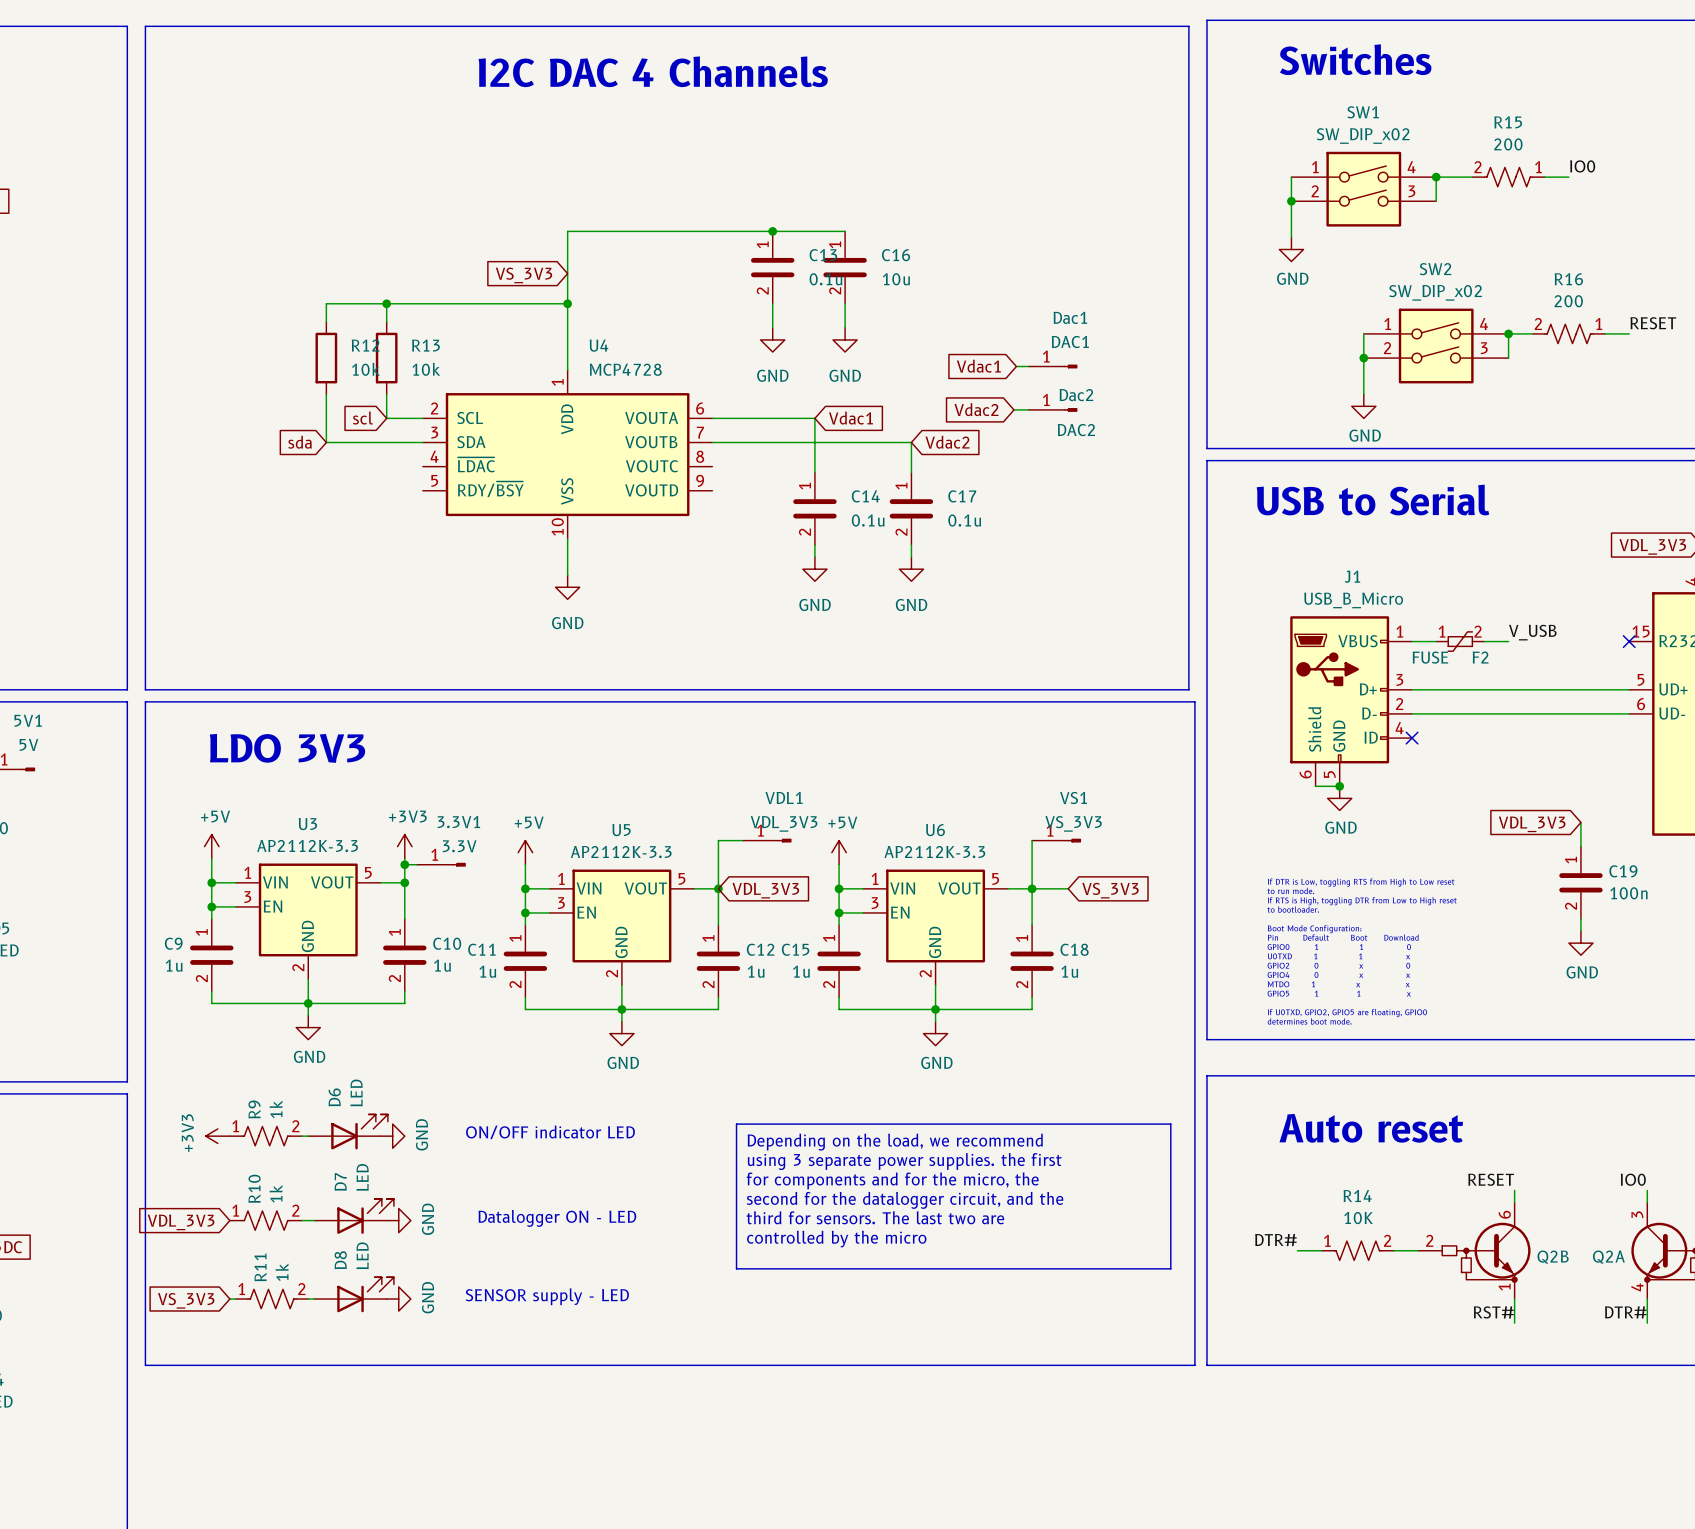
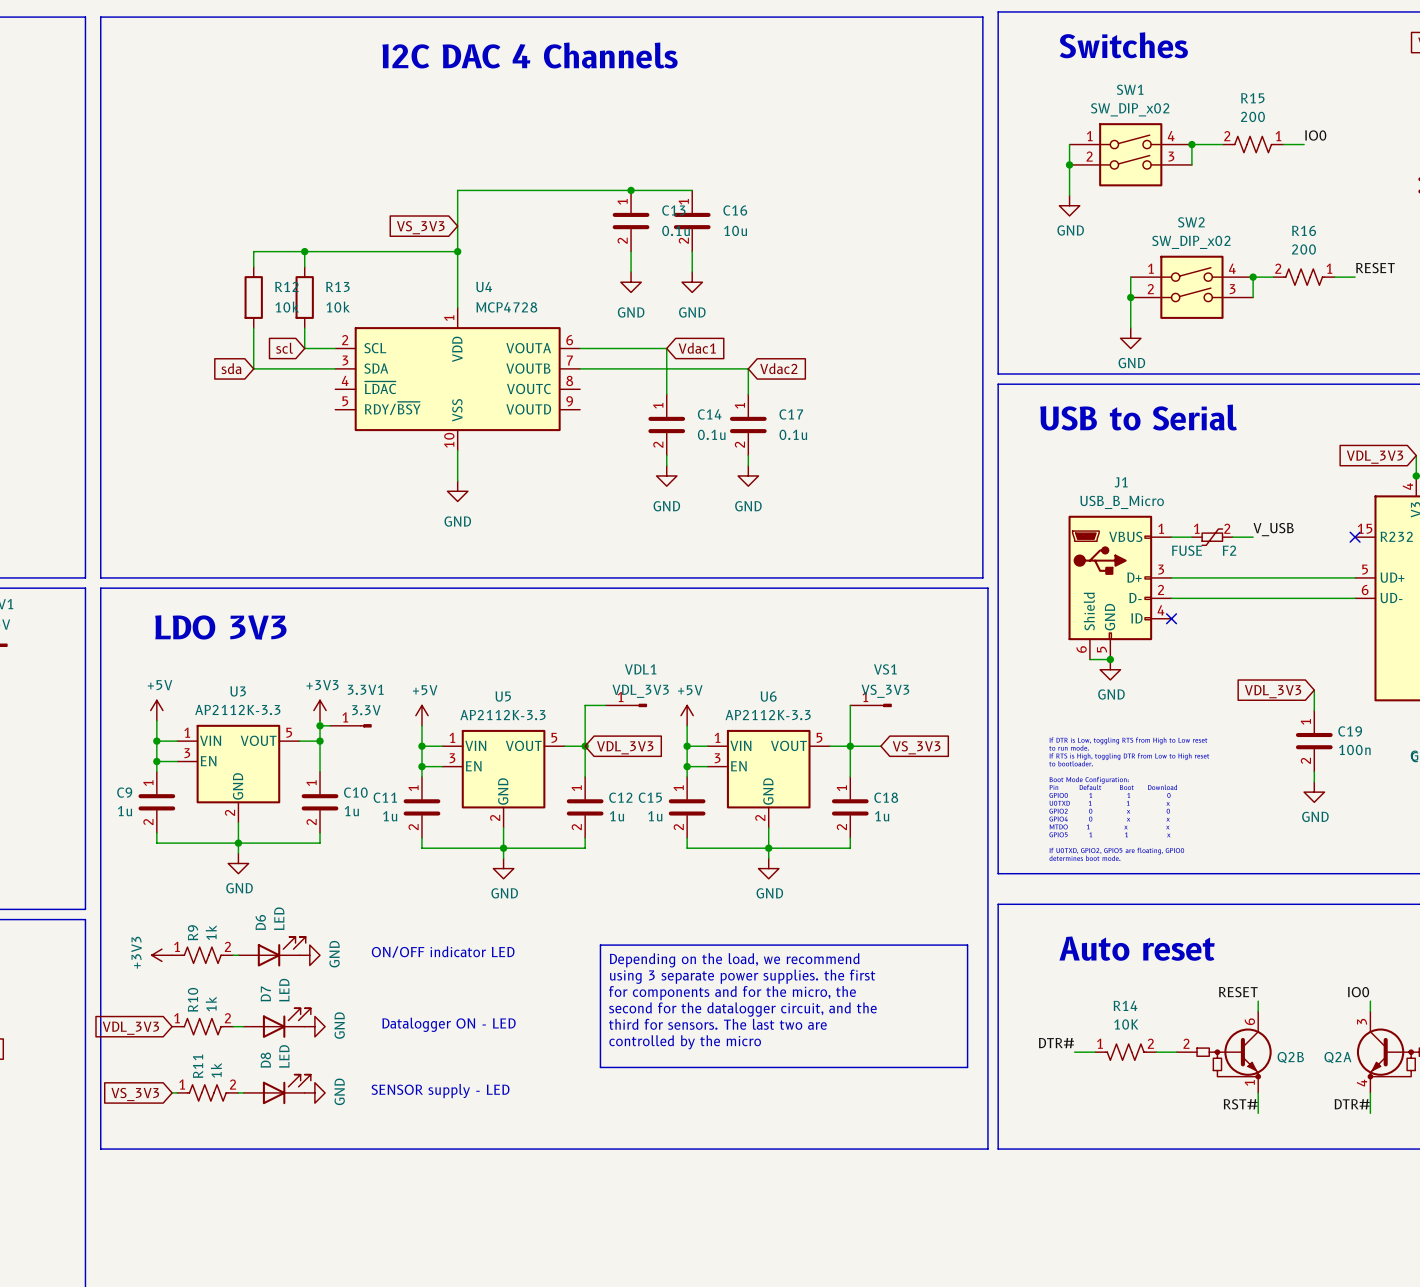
global label: Vdac1 (978, 366) -> none
wire: (1016, 366) (1028, 366) -> none
Dac1: DAC1 (1052, 366) -> none
global label: Vdac2 (976, 409) -> none
wire: (1013, 409) (1028, 409) -> none
Dac2: DAC2 (1052, 409) -> none

